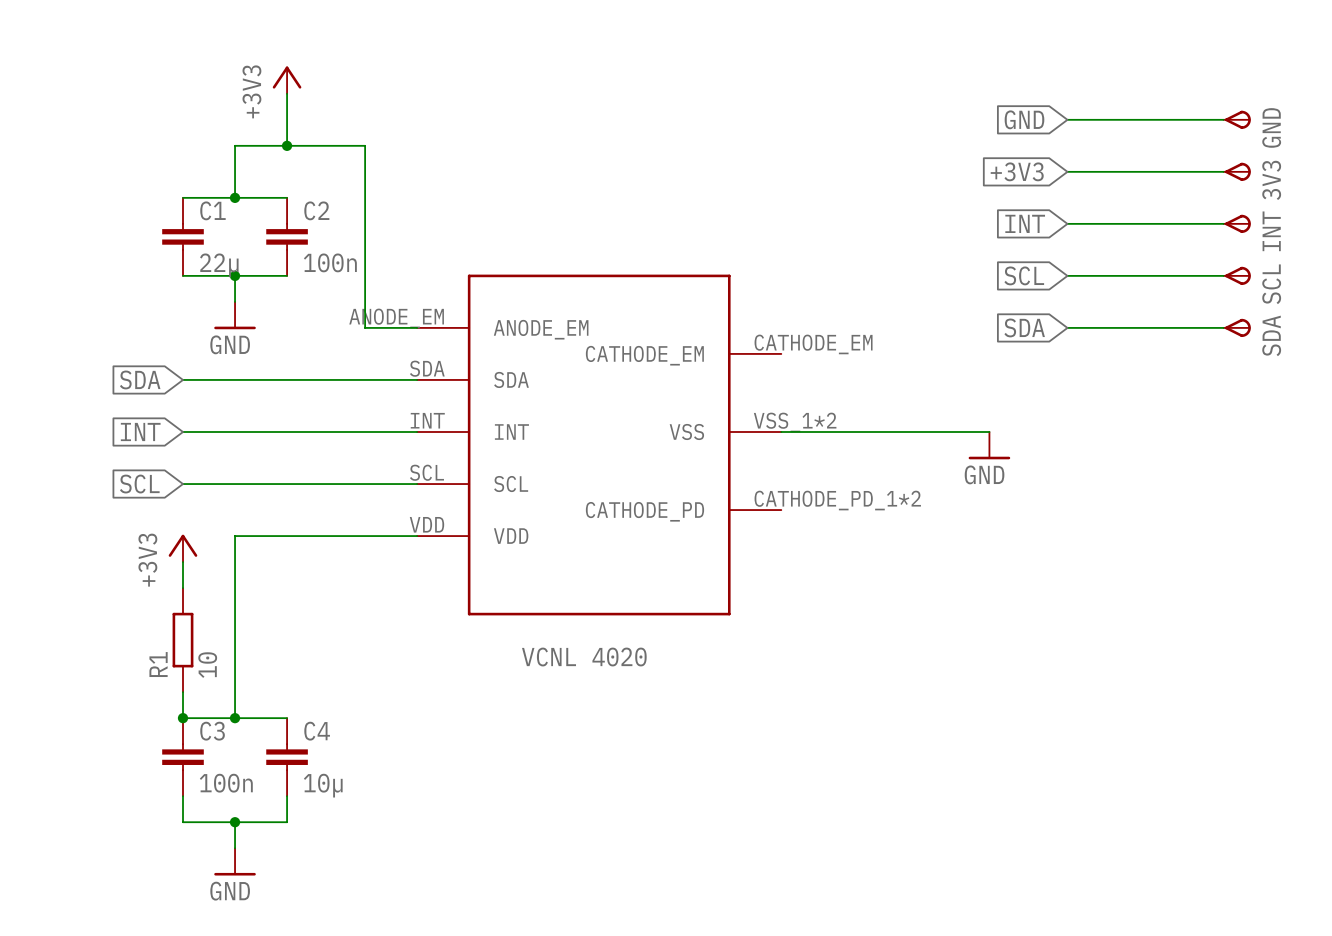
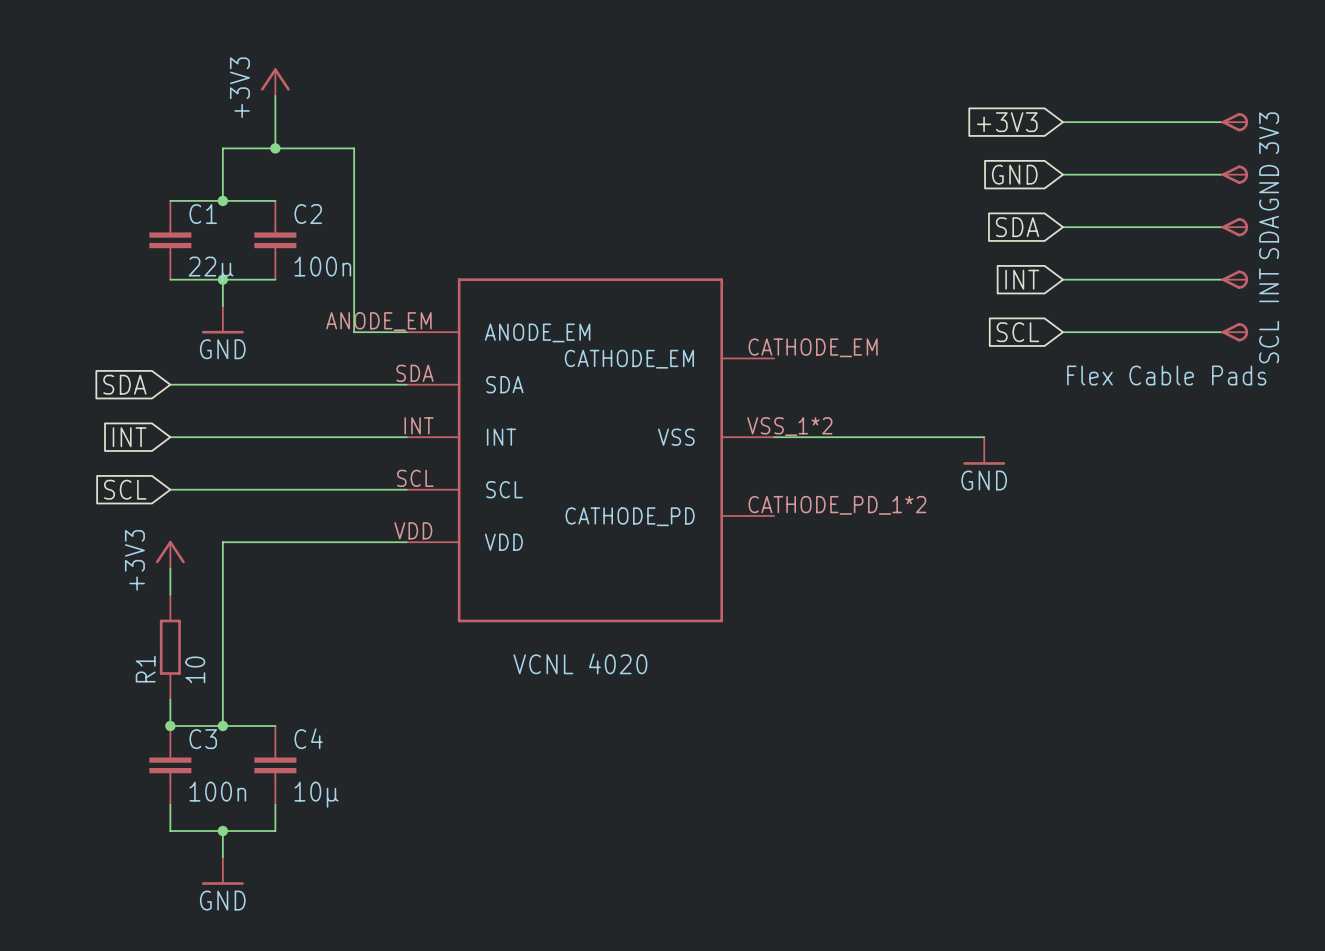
global label: GND (1024, 119) -> +3V3 (1007, 122)
GND name: GND (1271, 127) -> 3V3 (1269, 133)
global label: +3V3 (1017, 171) -> GND (1014, 174)
3V3 name: 3V3 (1271, 180) -> GND (1269, 187)
global label: INT (1025, 223) -> SDA (1017, 227)
INT name: INT (1271, 231) -> SDA (1269, 237)
global label: SCL (1024, 275) -> INT (1022, 279)
SCL name: SCL (1271, 284) -> INT (1269, 285)
global label: SDA (1024, 327) -> SCL (1017, 332)
SDA name: SDA (1271, 335) -> SCL (1269, 342)
text: none -> Flex Cable Pads (1166, 375)

